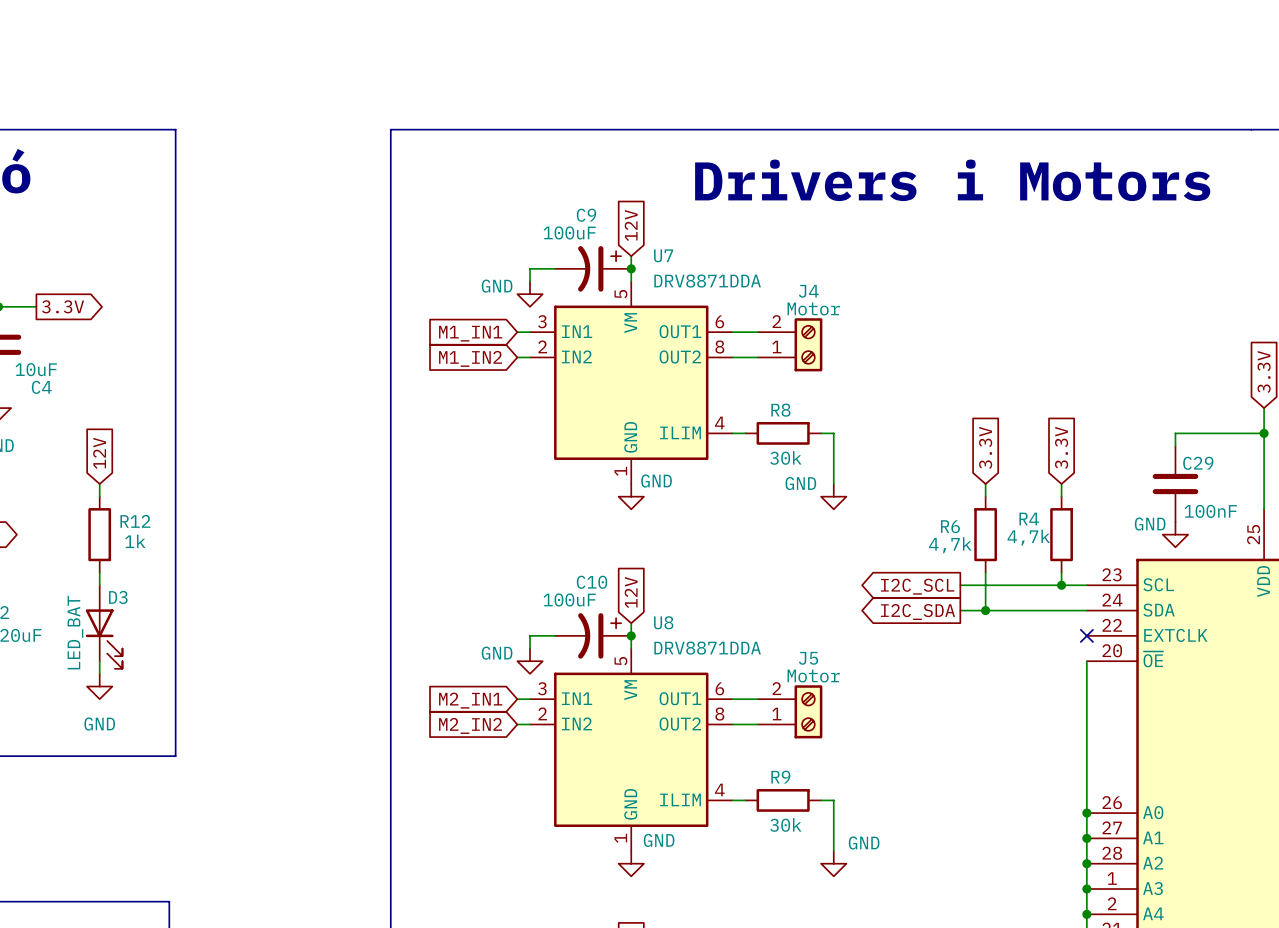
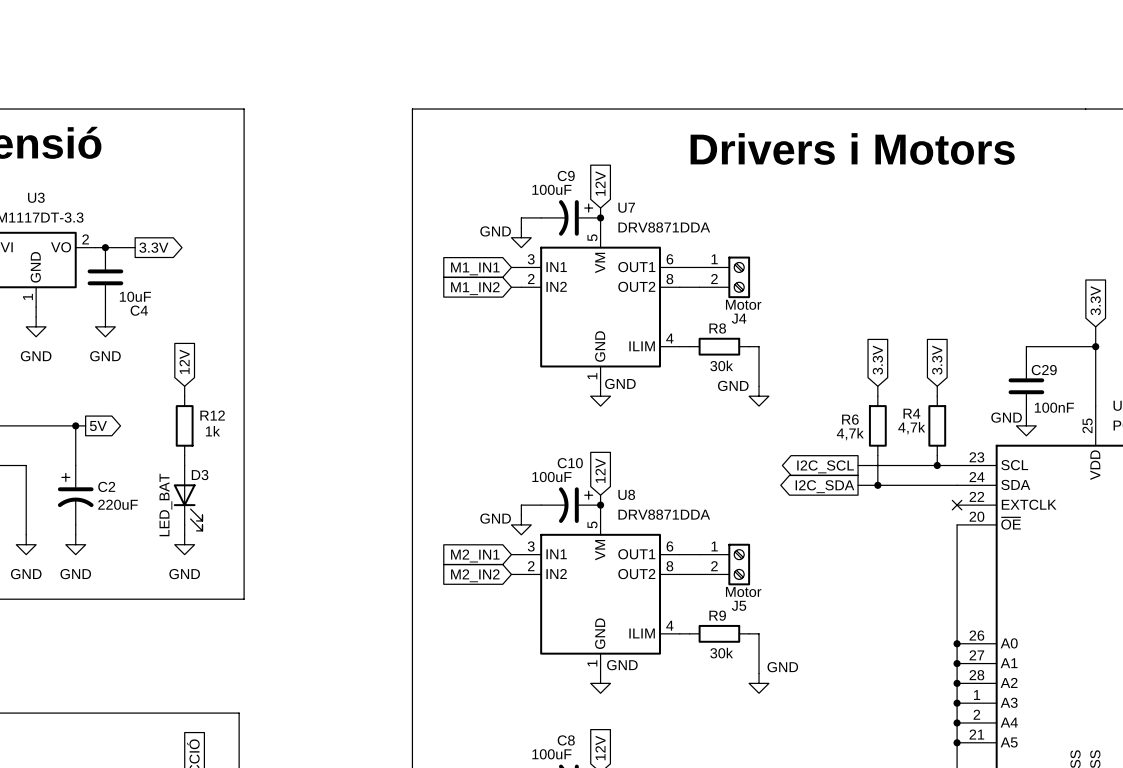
J4 flip: as is (808, 344) -> up-down (739, 277)
J5 flip: as is (808, 711) -> up-down (739, 564)

